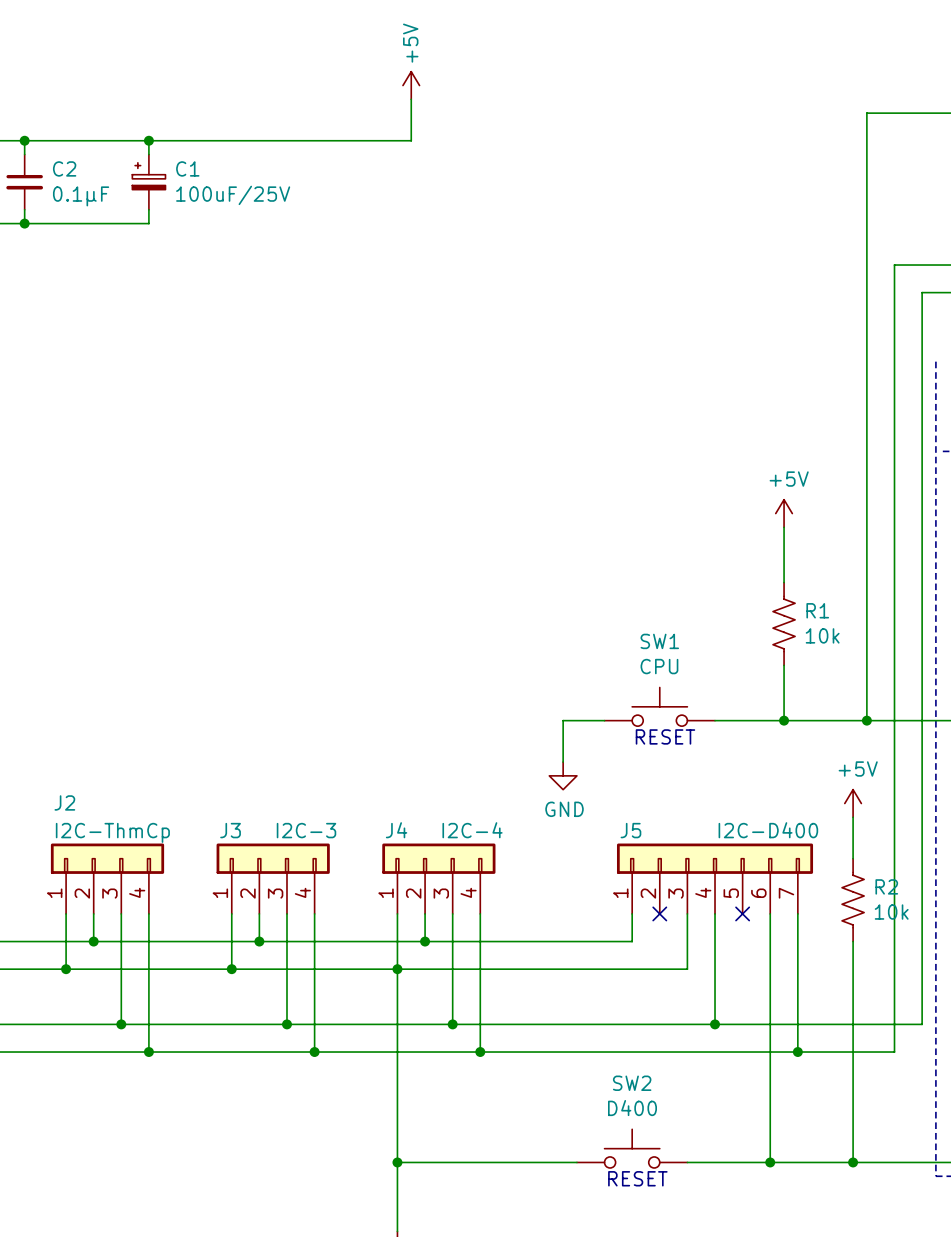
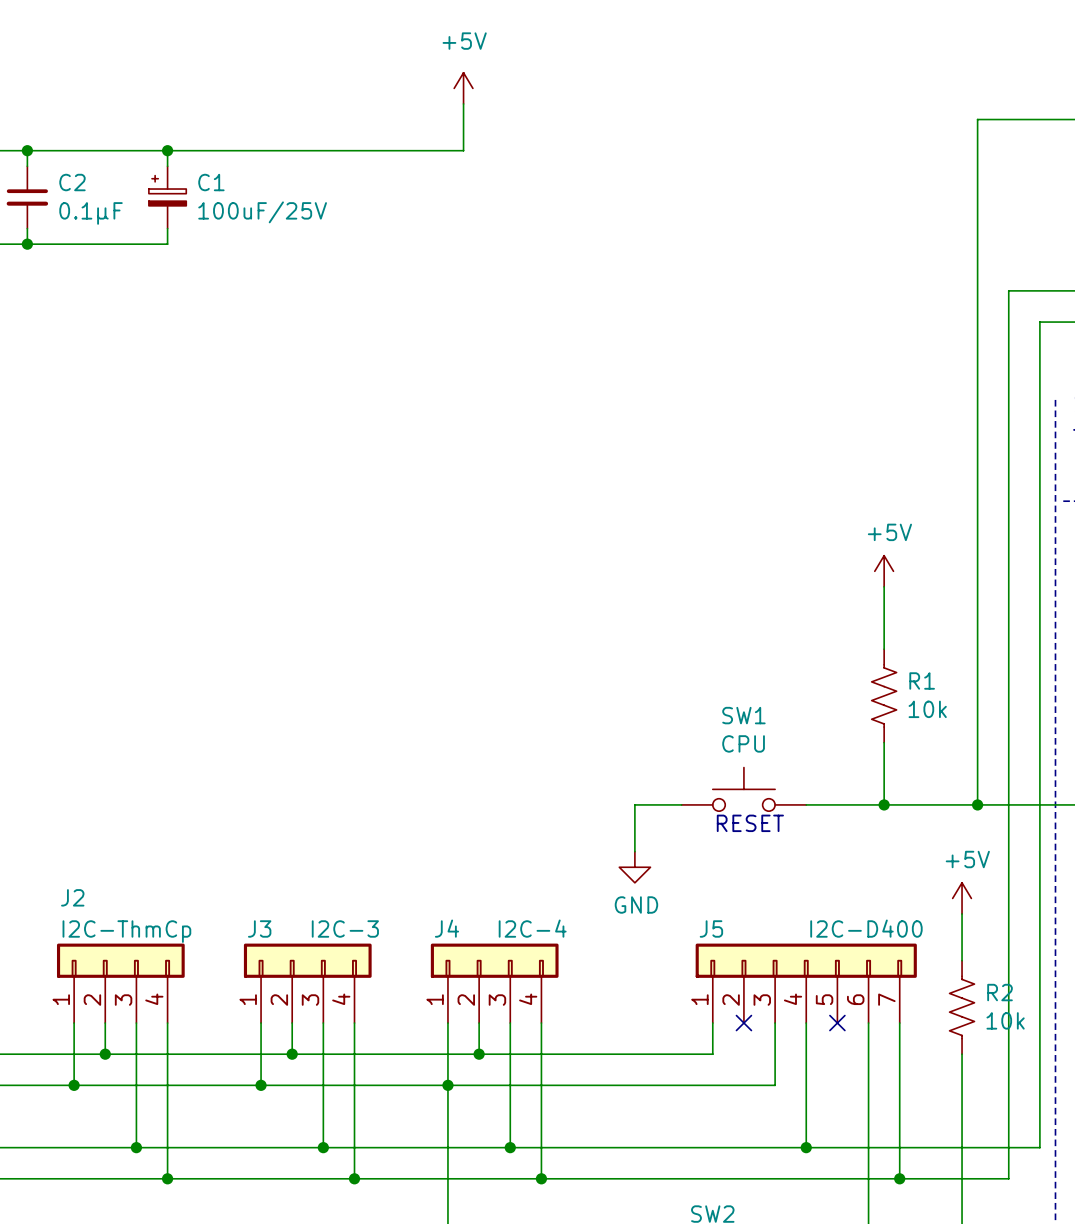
power symbol text rotation: 0° (410, 43) -> 90° clockwise (464, 41)

